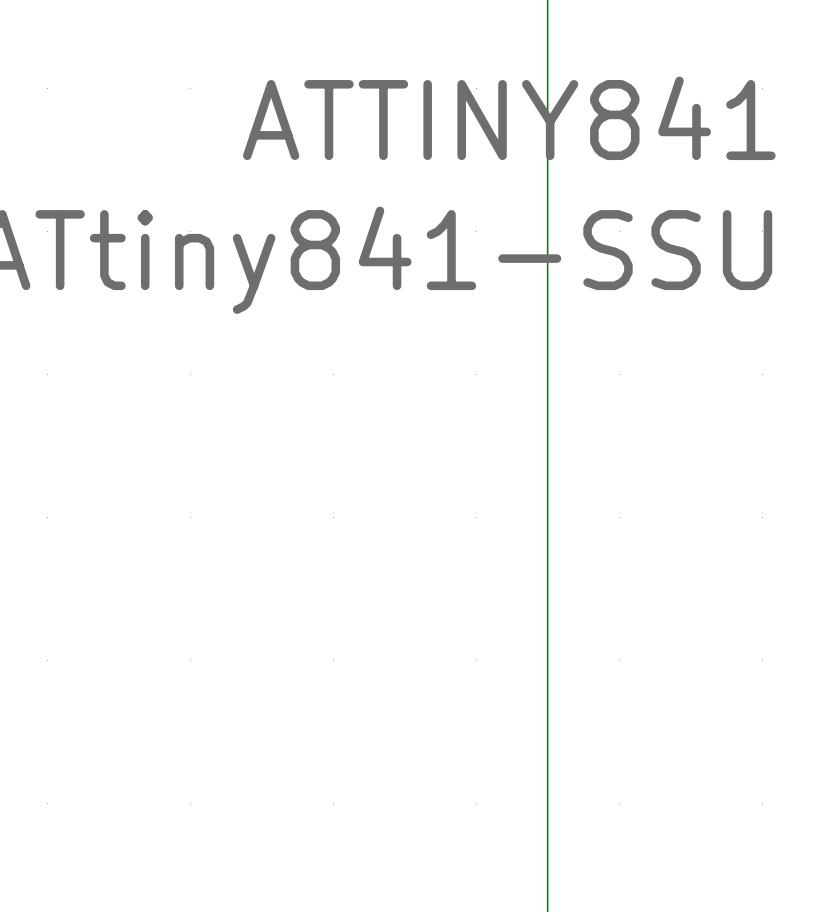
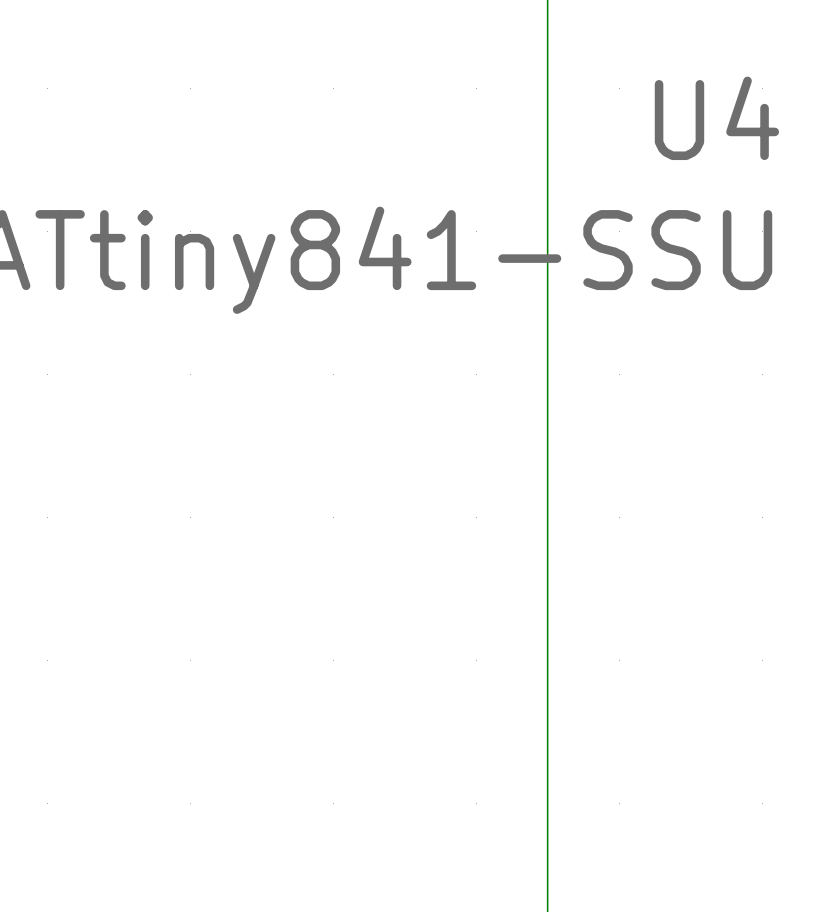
ATTINY841 name: ATTINY841 (509, 118) -> U4 (716, 118)

